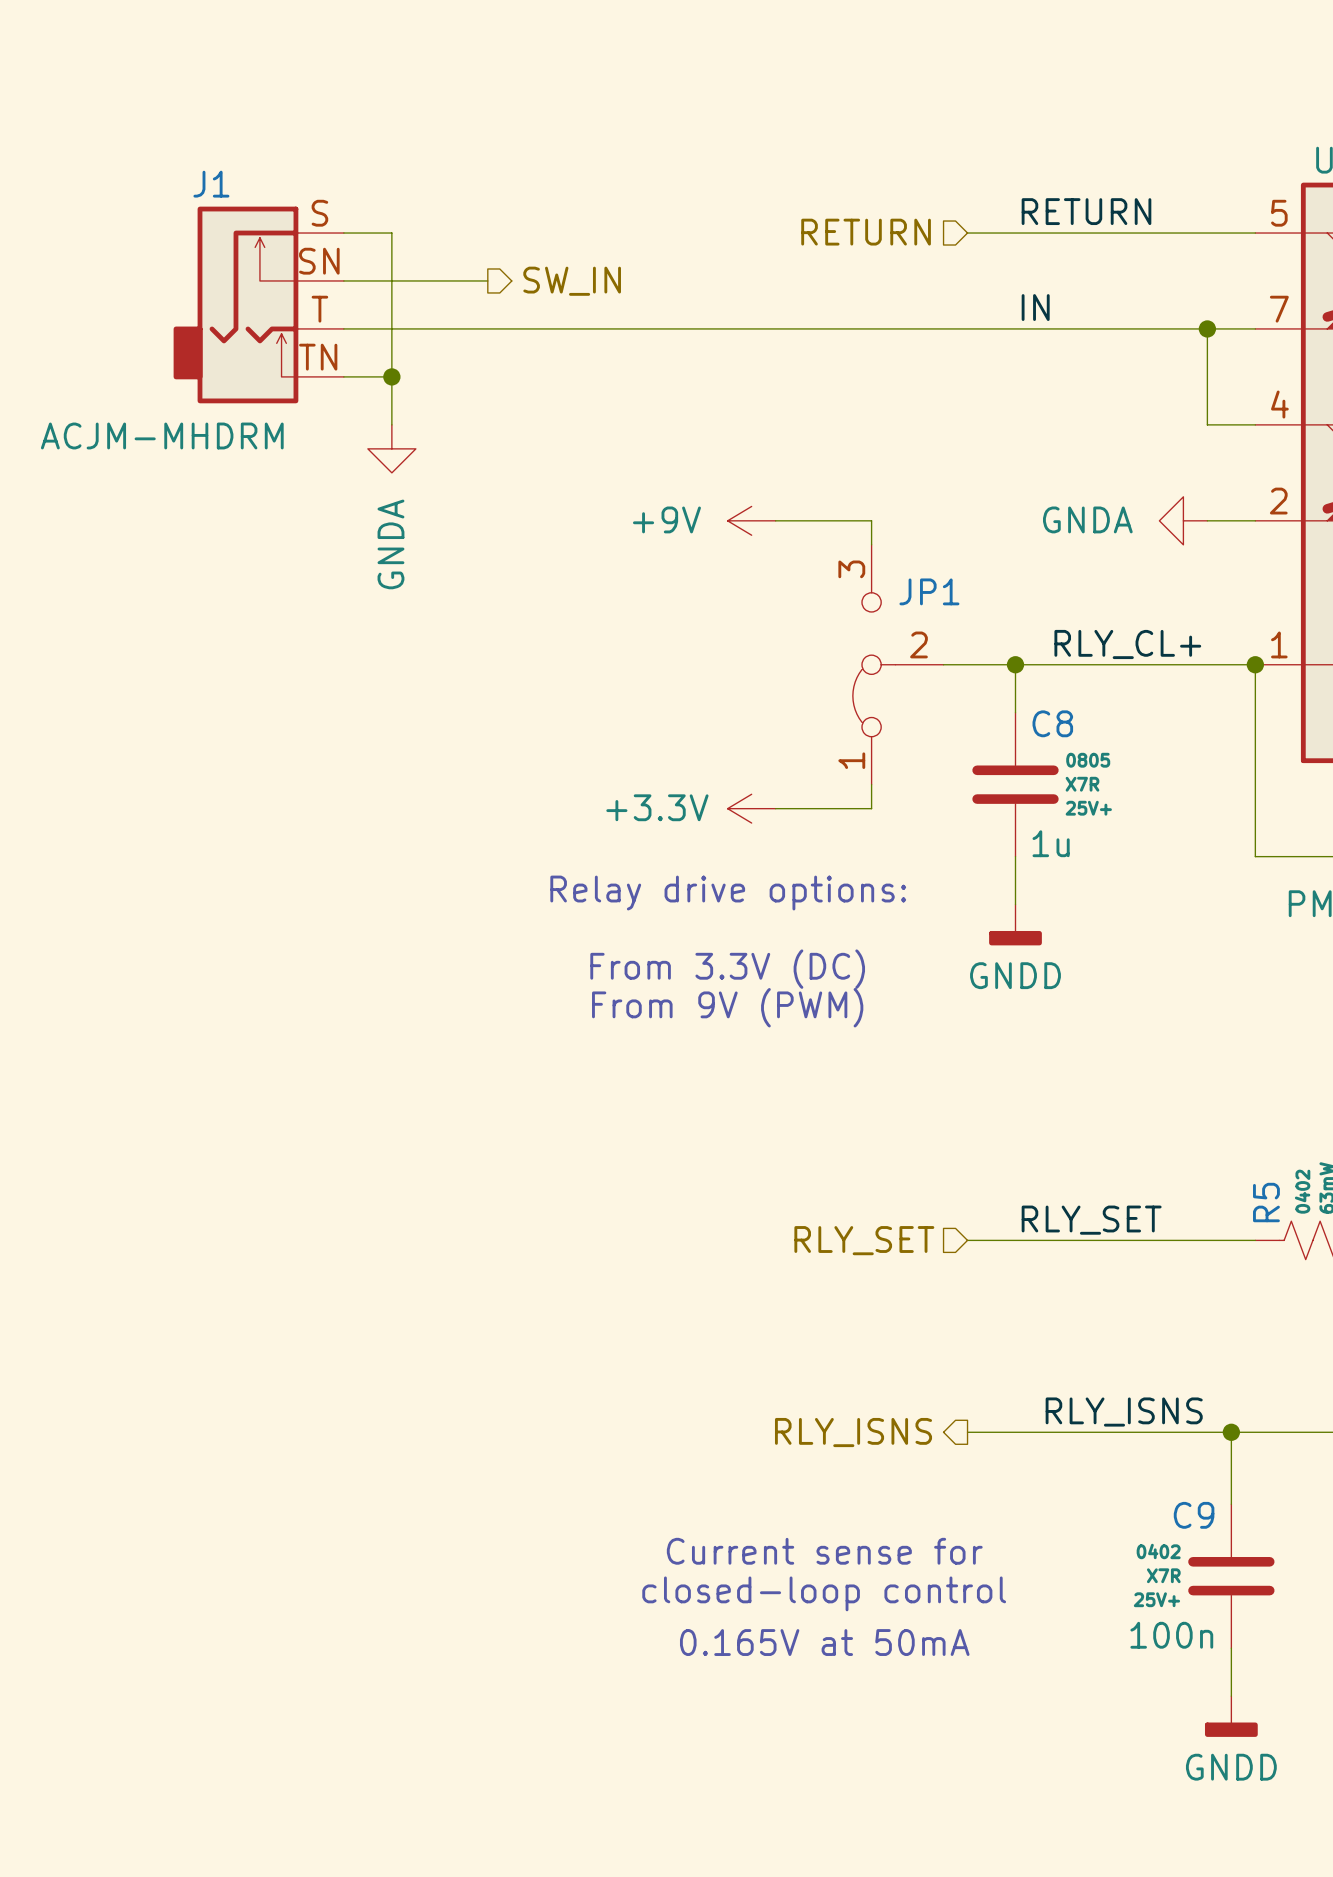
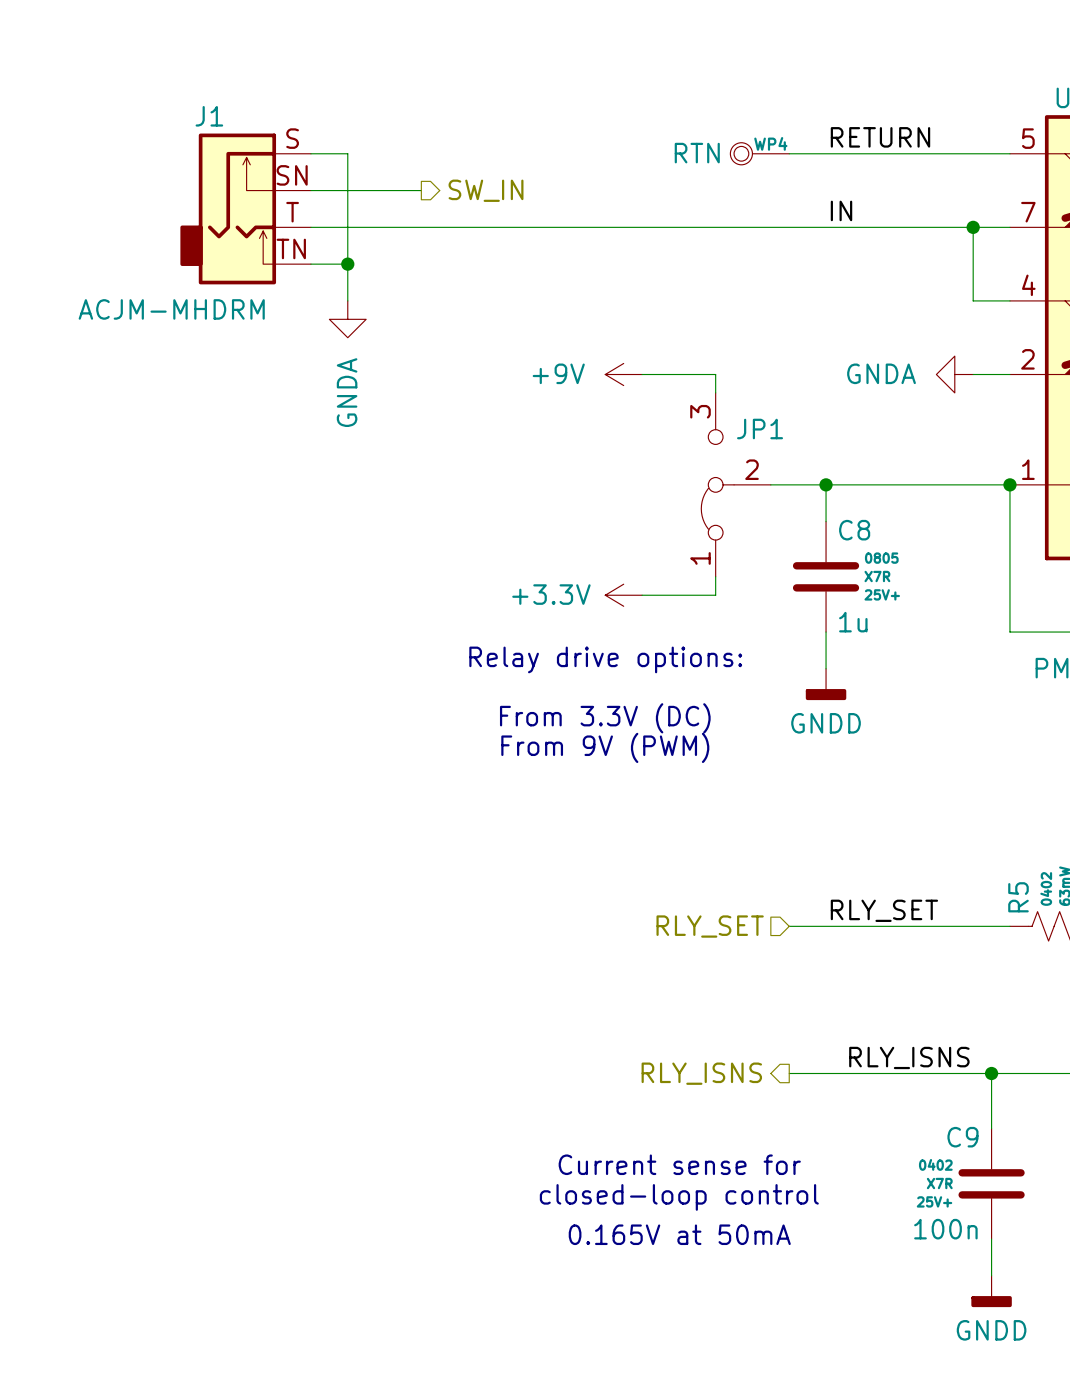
hierarchical label: RETURN (866, 232) -> none
WP4: none -> RTN (759, 153)
label: RLY_CL+ (1127, 644) -> none

